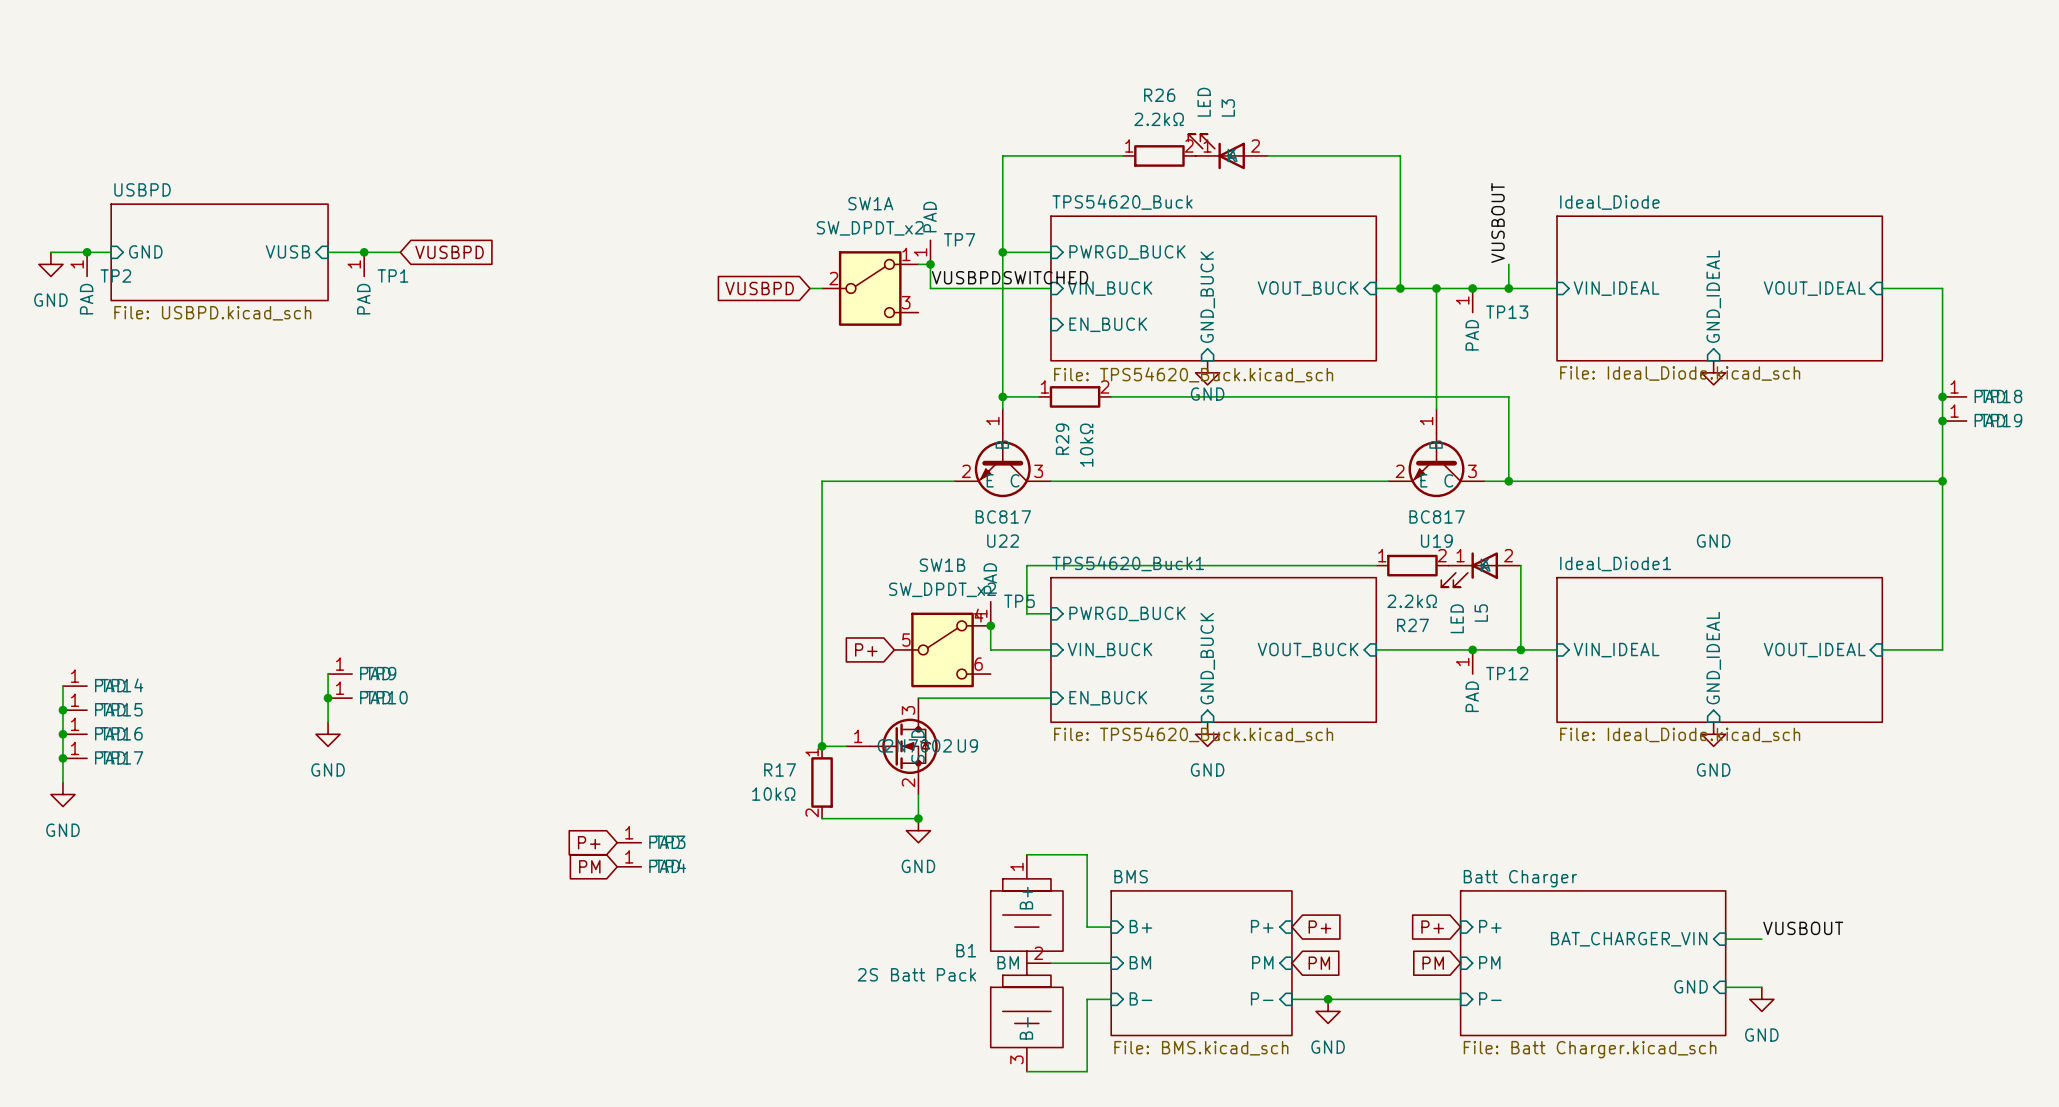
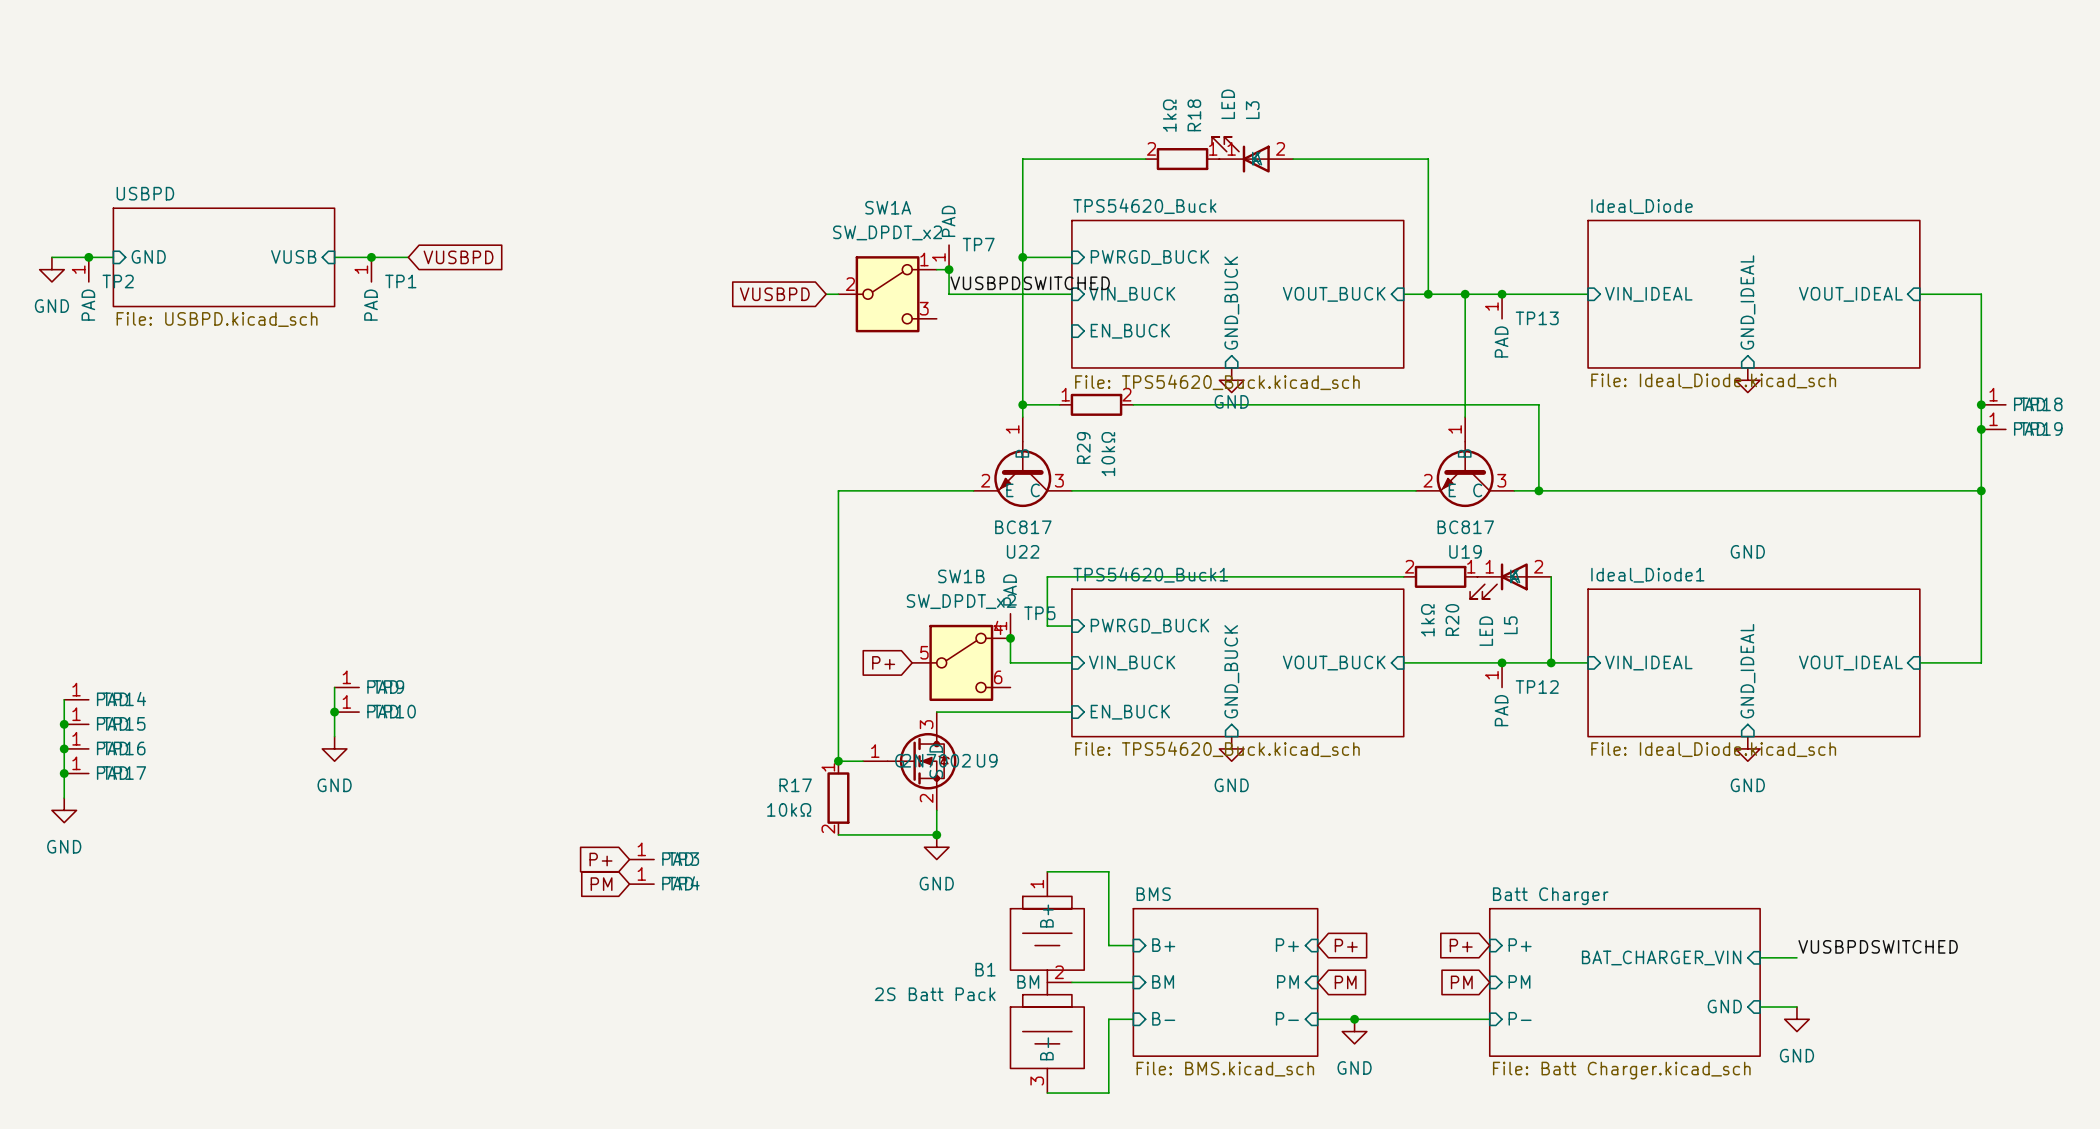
R26 name: R26 (1159, 95) -> R18 (1194, 115)
R26 value: 2.2kΩ (1159, 119) -> 1kΩ (1169, 115)
R26 rotation: 0° (1159, 155) -> 180° (1182, 159)
label: VUSBOUT (1498, 222) -> none
wire: (1508, 264) (1508, 288) -> none
junction: (1508, 288) -> none
R27 rotation: 0° (1412, 565) -> 180° (1440, 576)
R27 value: 2.2kΩ (1412, 601) -> 1kΩ (1427, 620)
R27 name: R27 (1413, 625) -> R20 (1452, 619)
label: VUSBOUT (1803, 928) -> VUSBPDSWITCHED (1878, 946)

